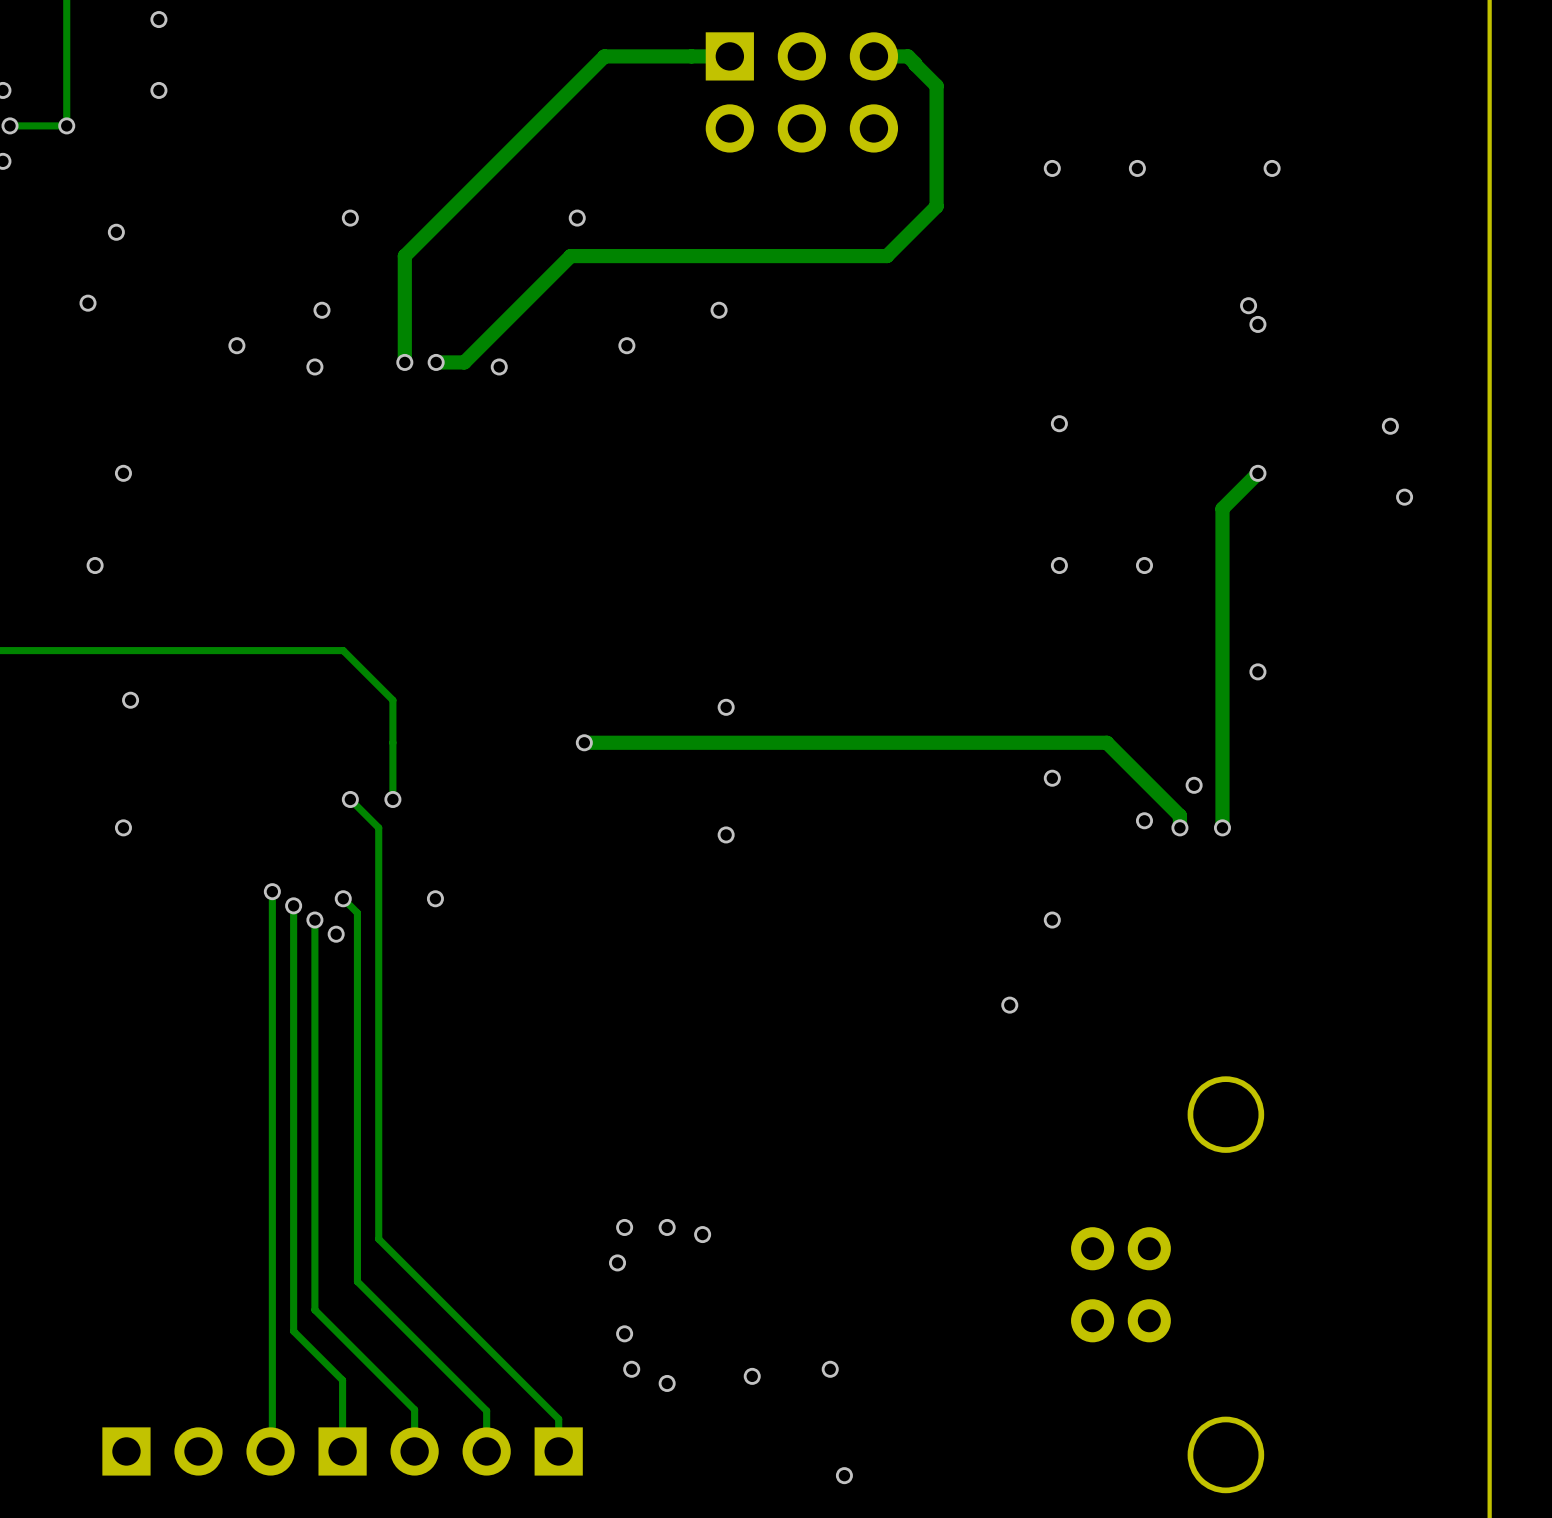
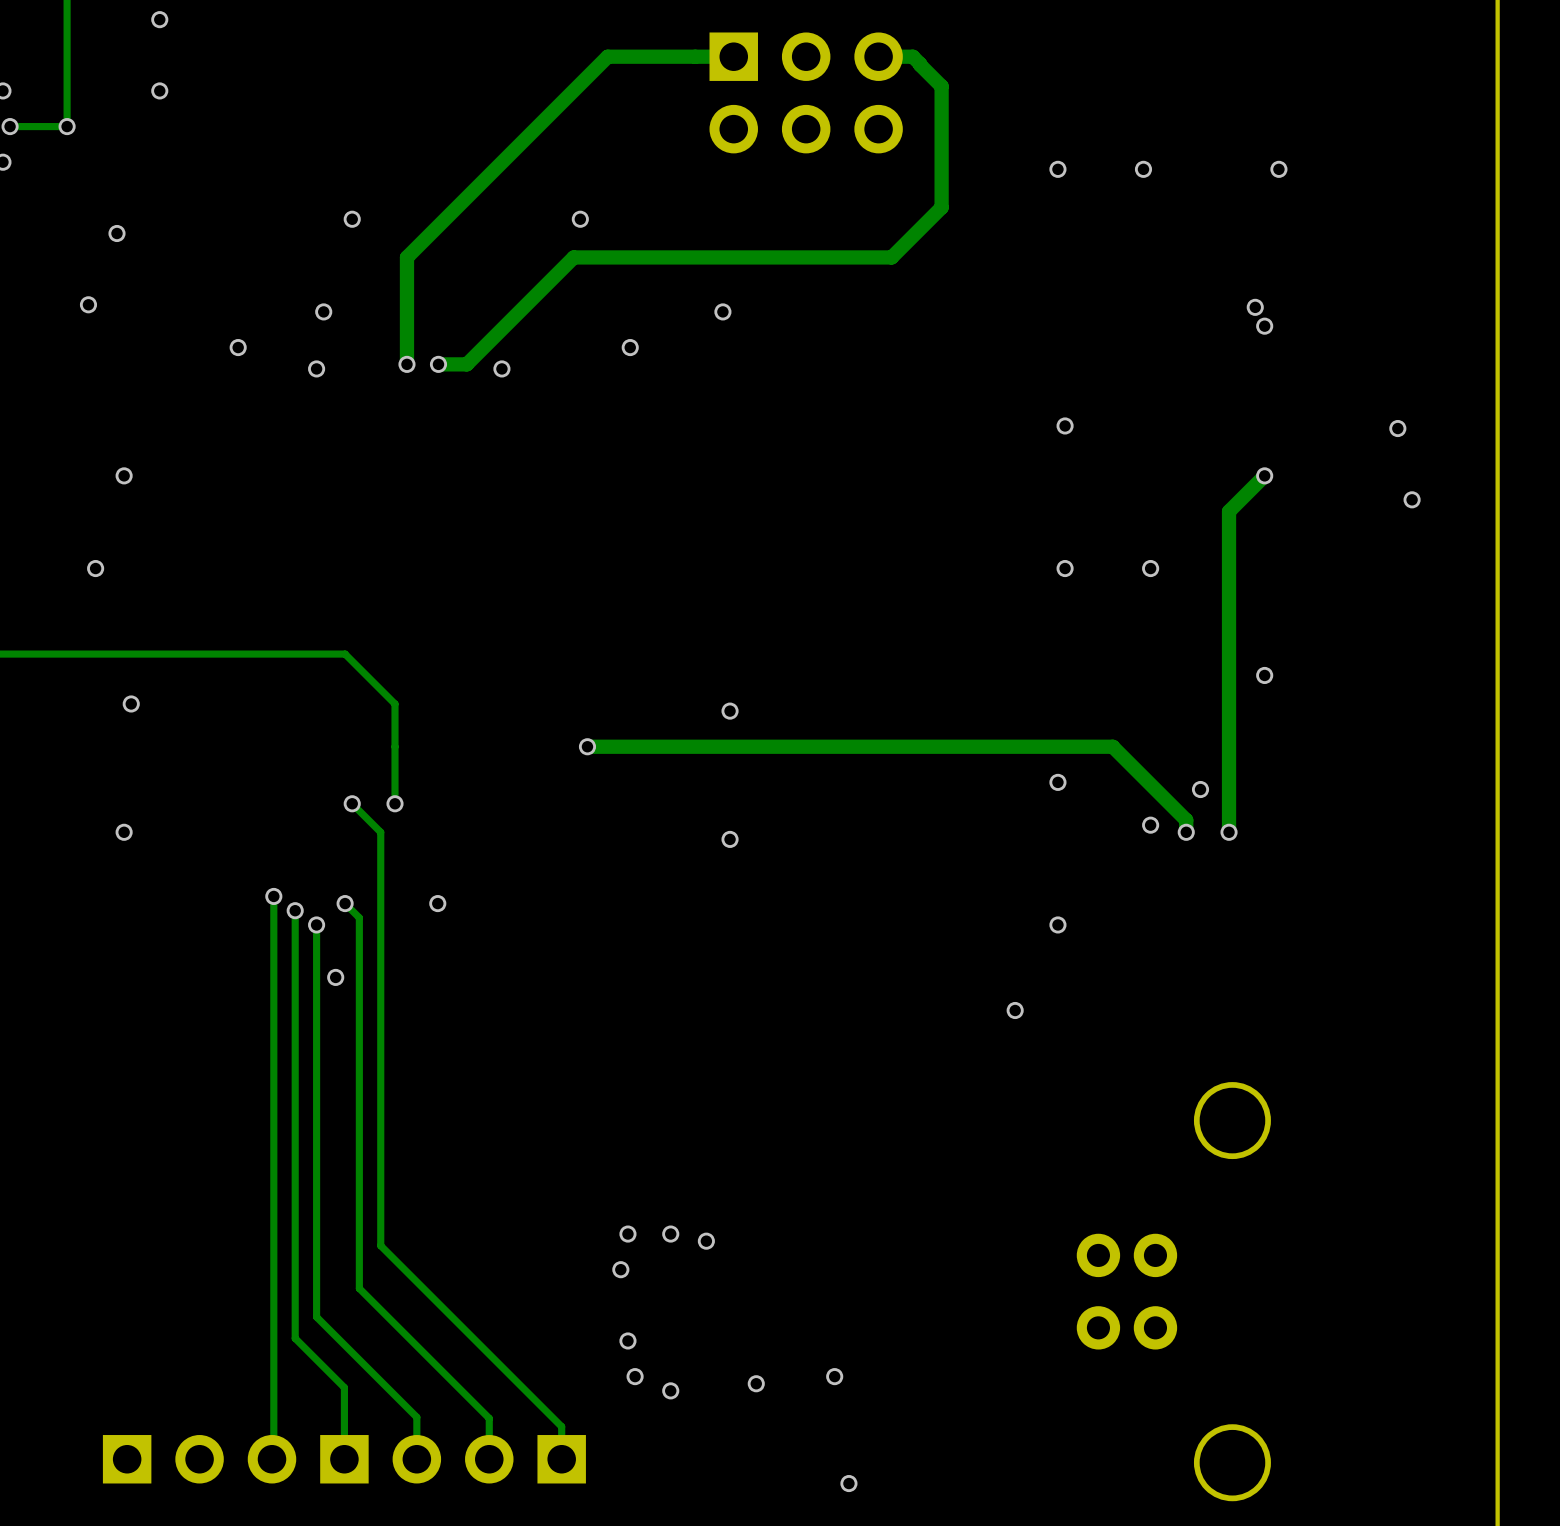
via position: (336, 934) -> (335, 977)

